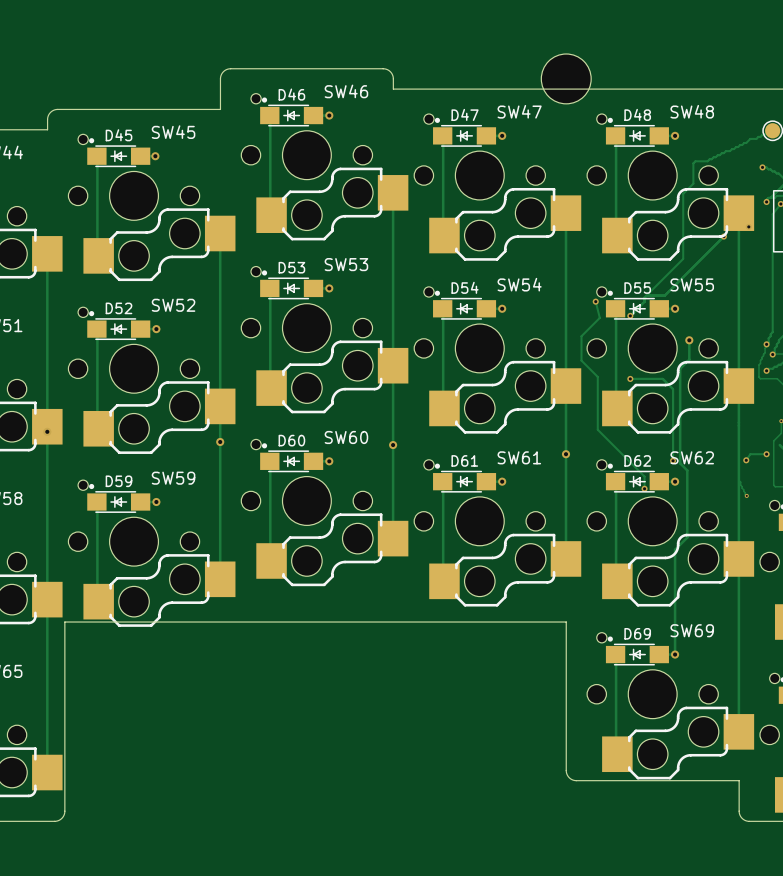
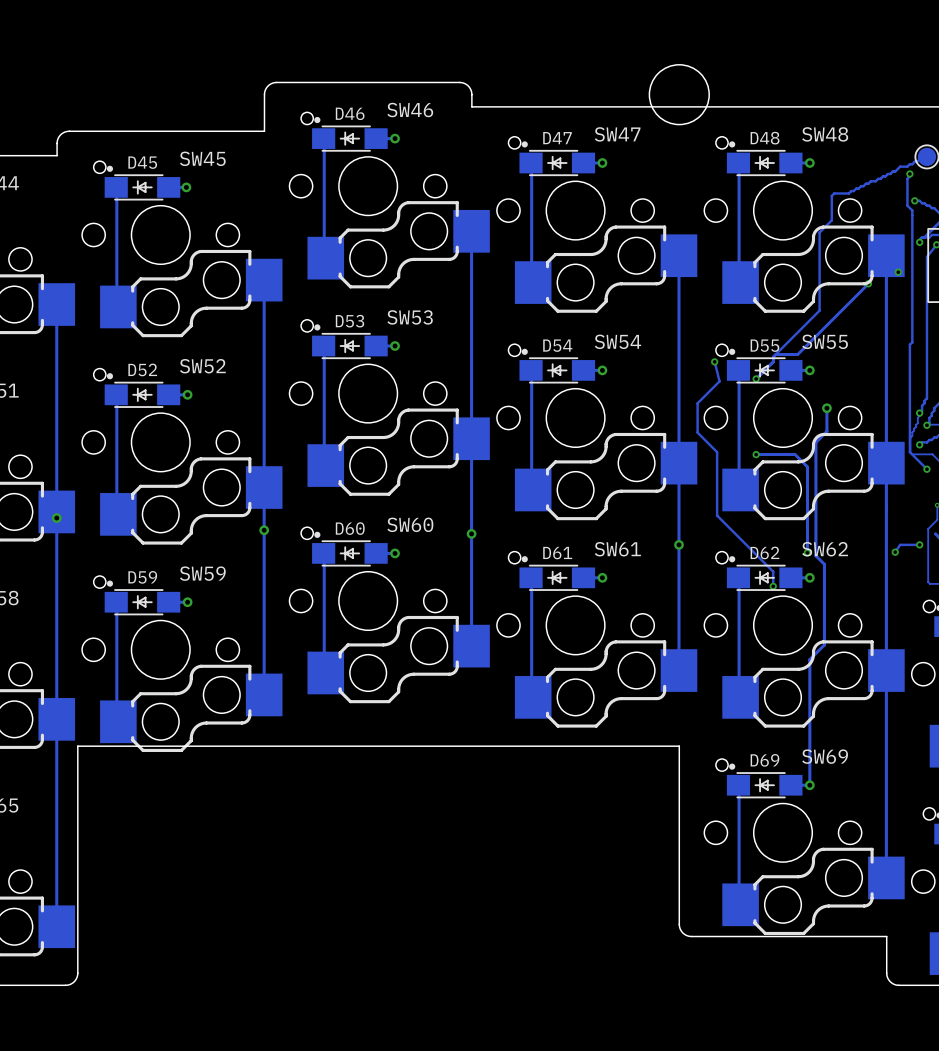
track: none -> (909, 173) (907, 178) (907, 205) (912, 210) (909, 452) (926, 469)
via: none -> (909, 173)
via: none -> (926, 469)
track: (738, 480) (746, 495) -> none
via: (746, 495) -> none

